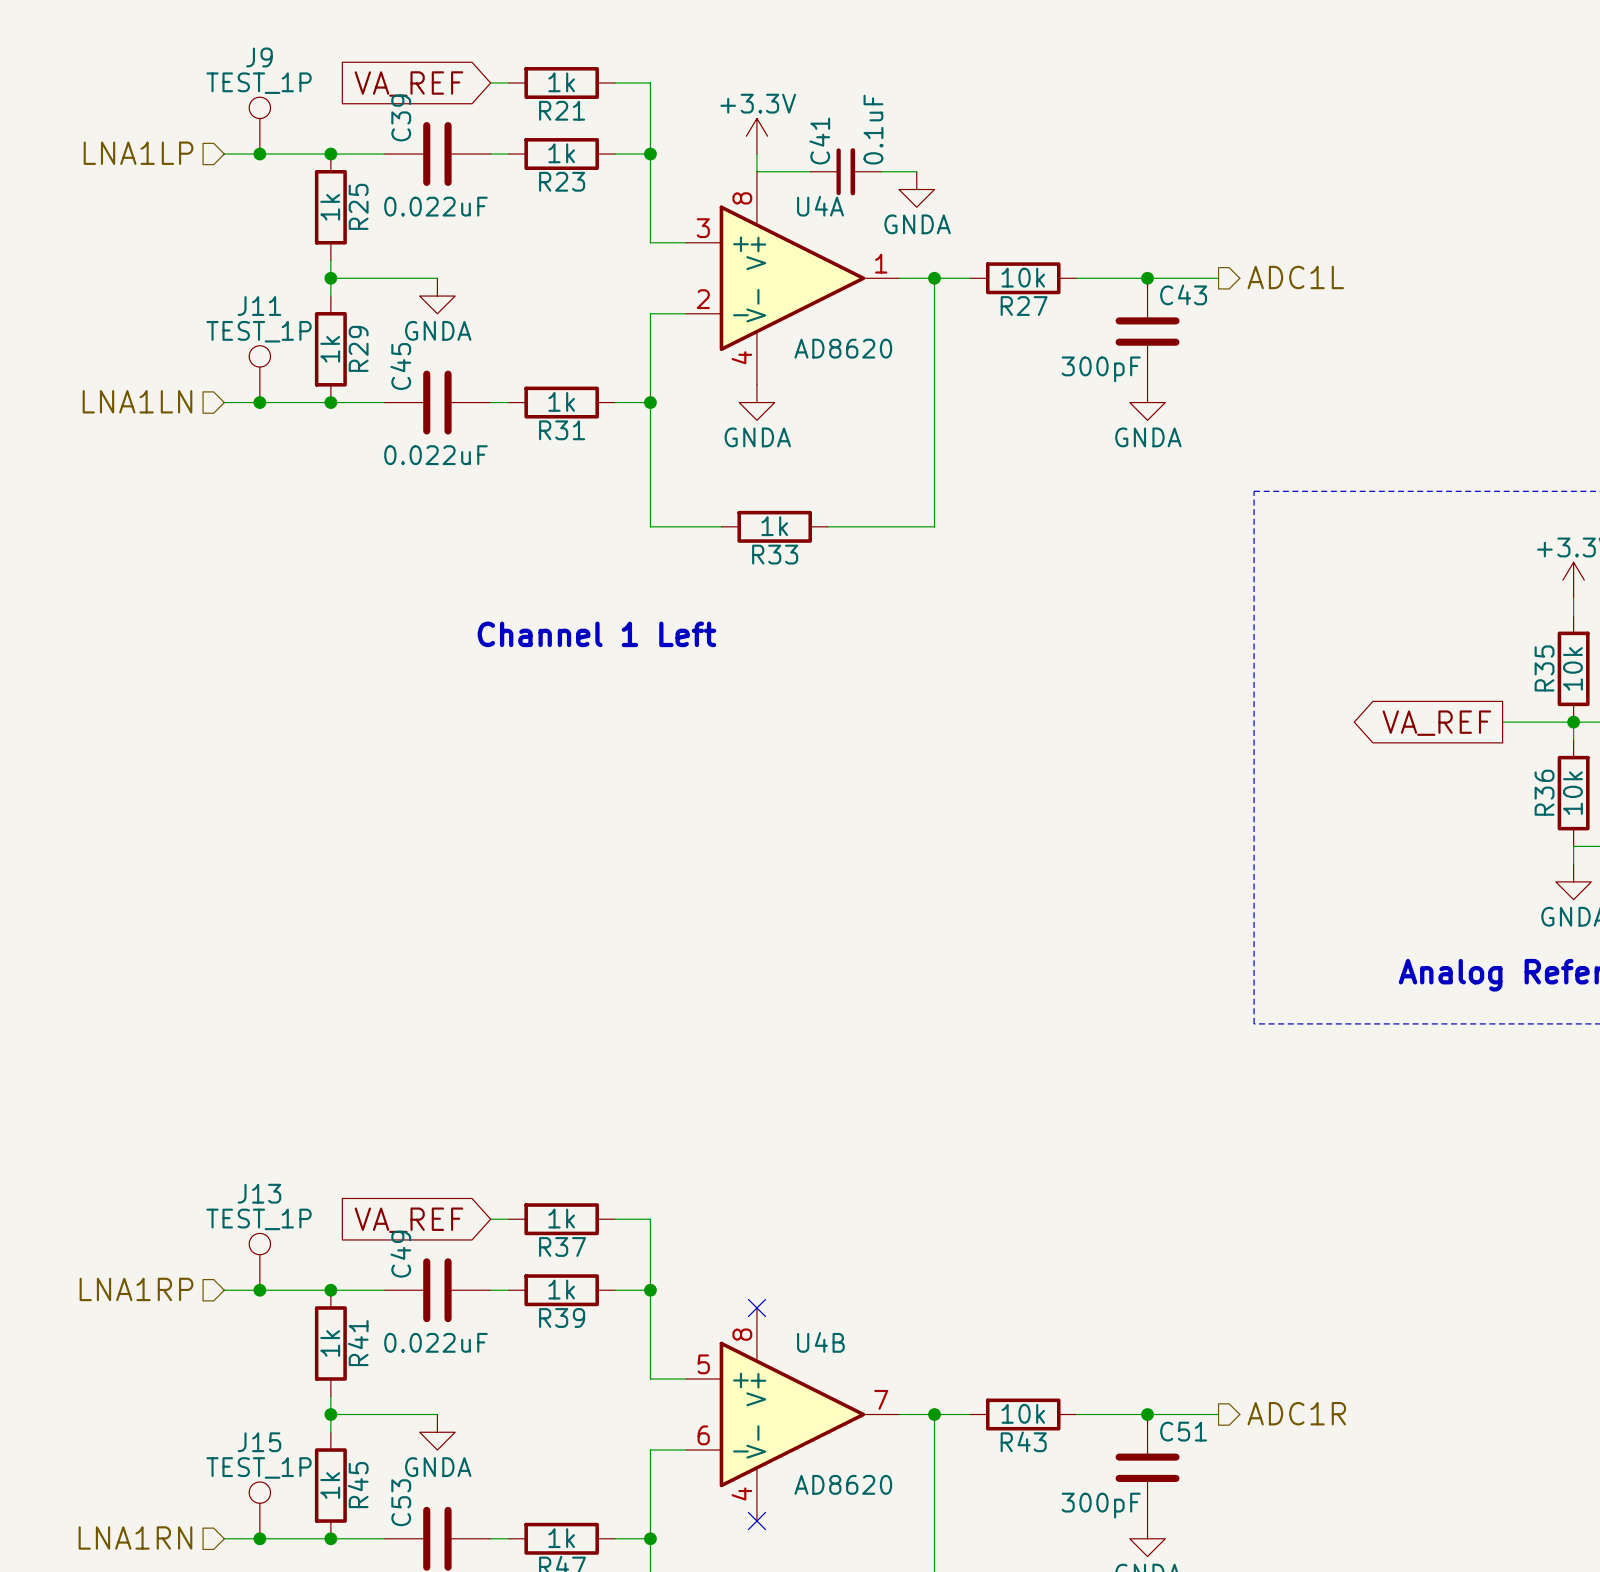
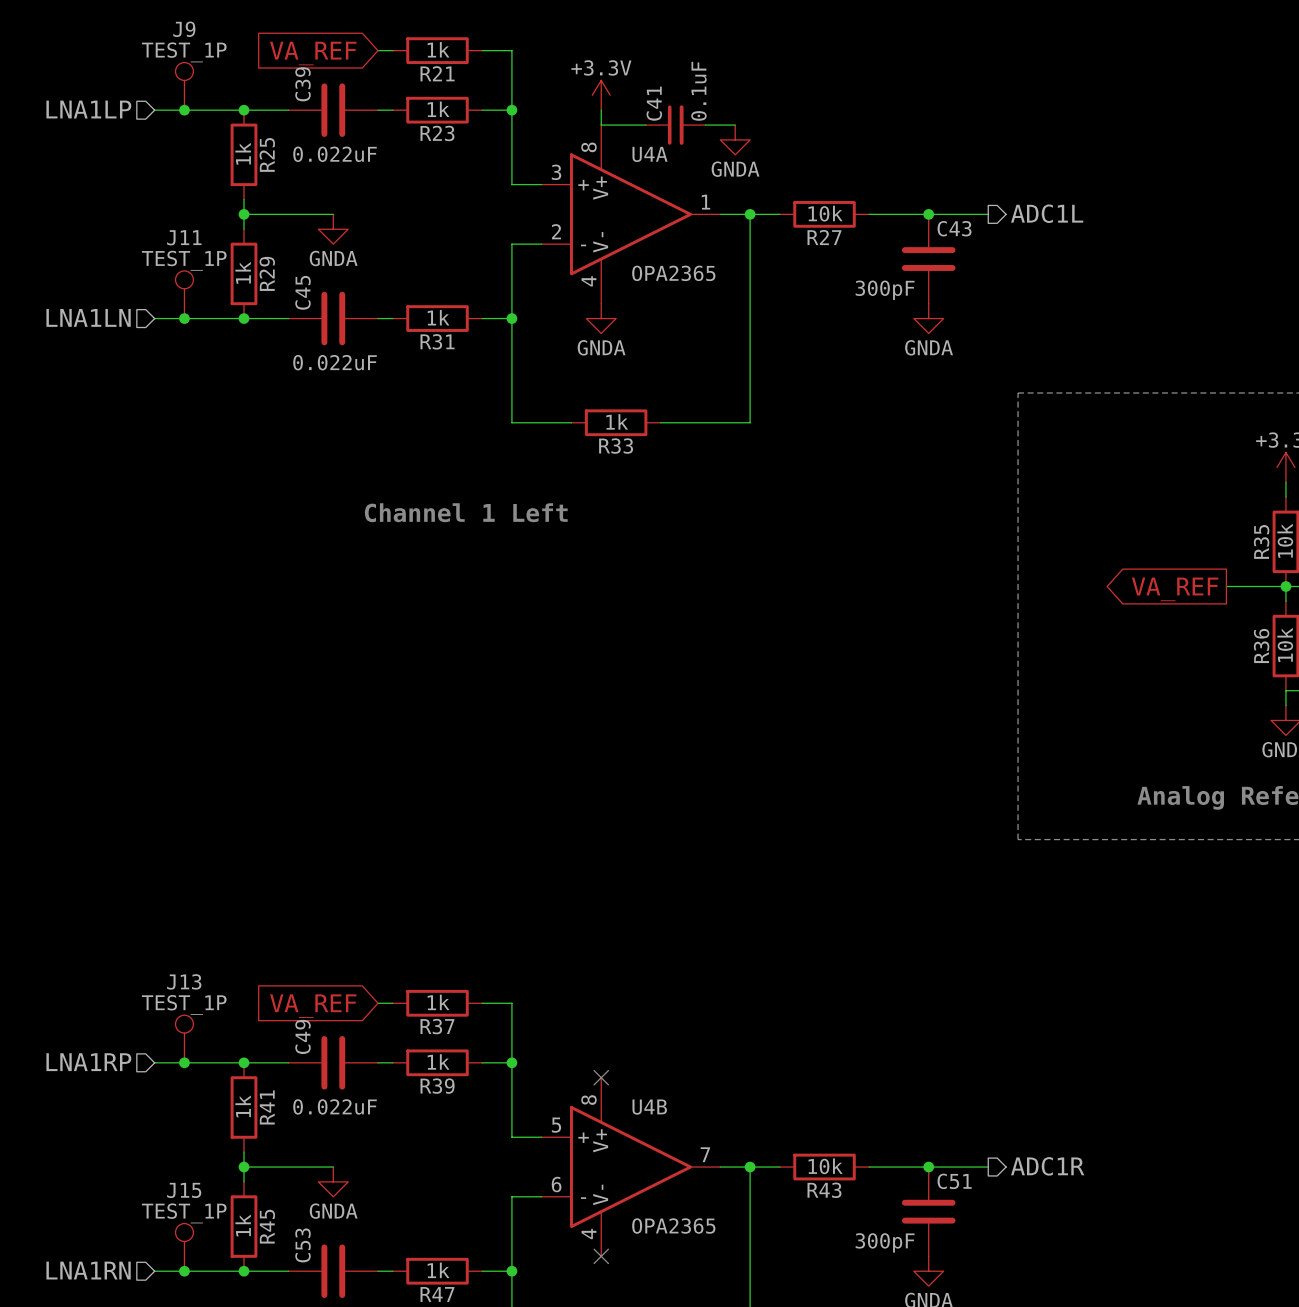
U4A value: AD8620 (843, 348) -> OPA2365 (673, 273)
U4B value: AD8620 (843, 1484) -> OPA2365 (673, 1226)

